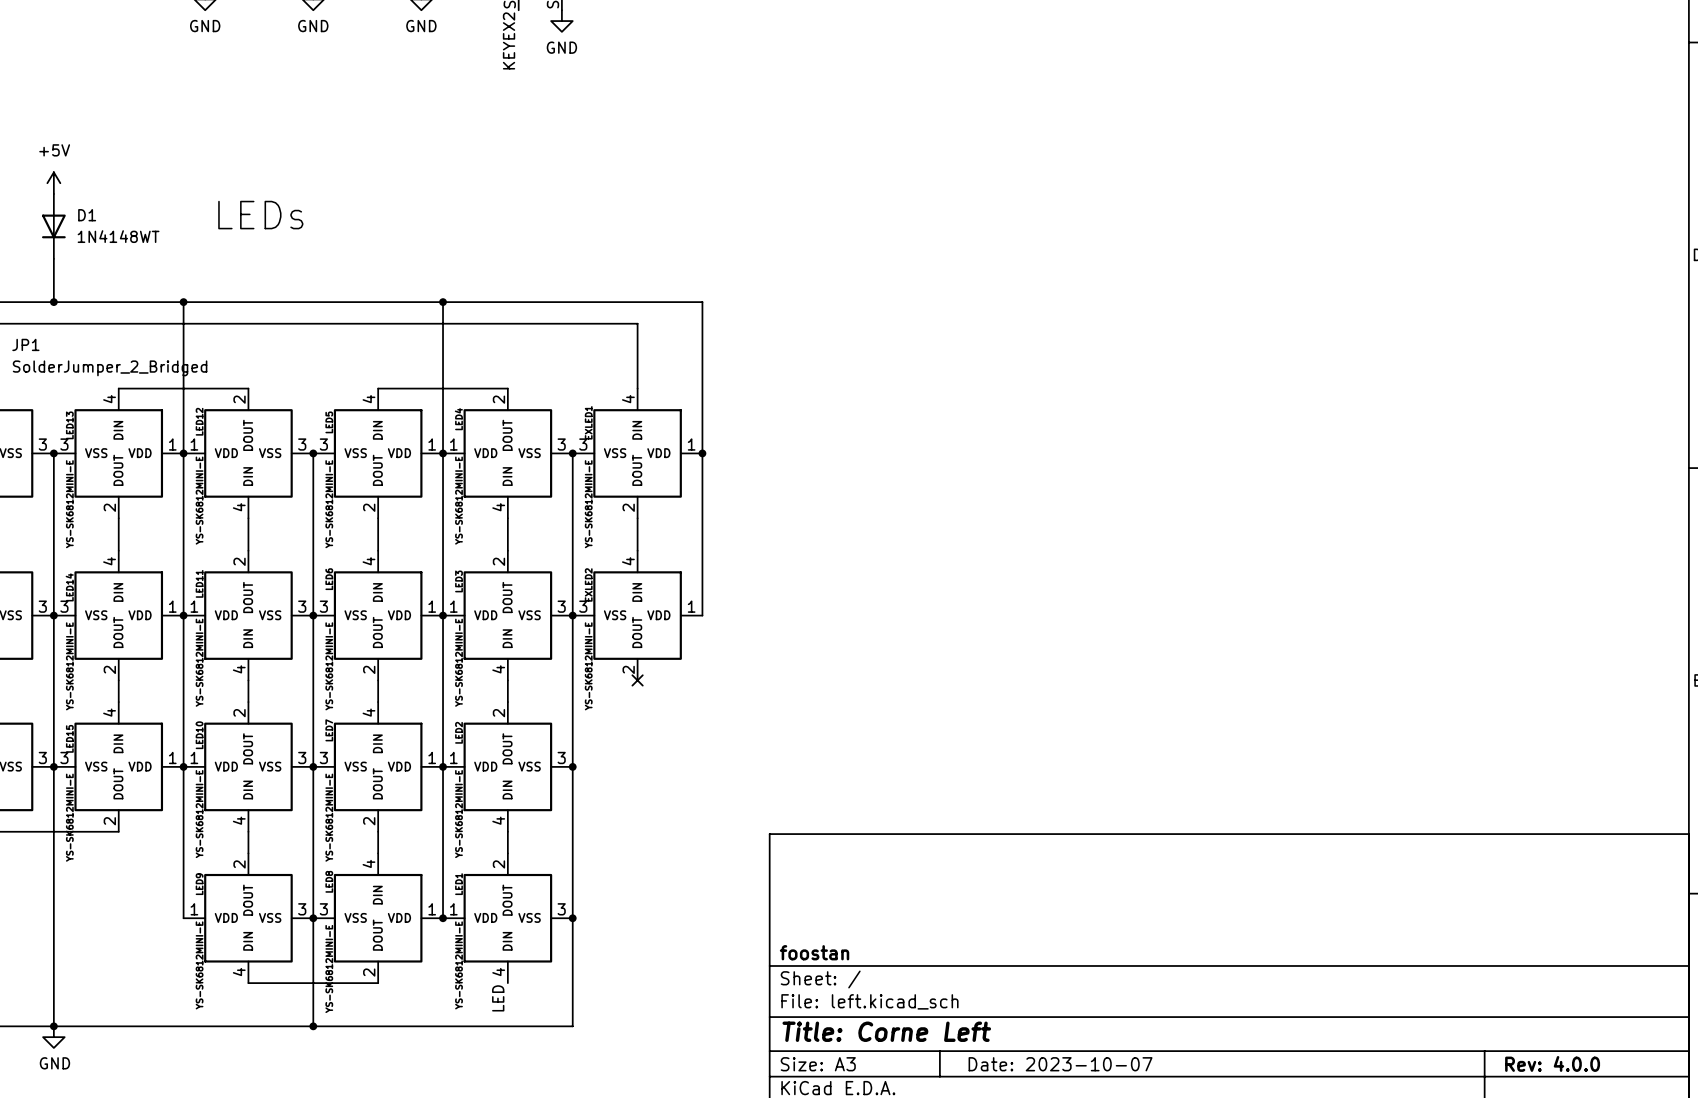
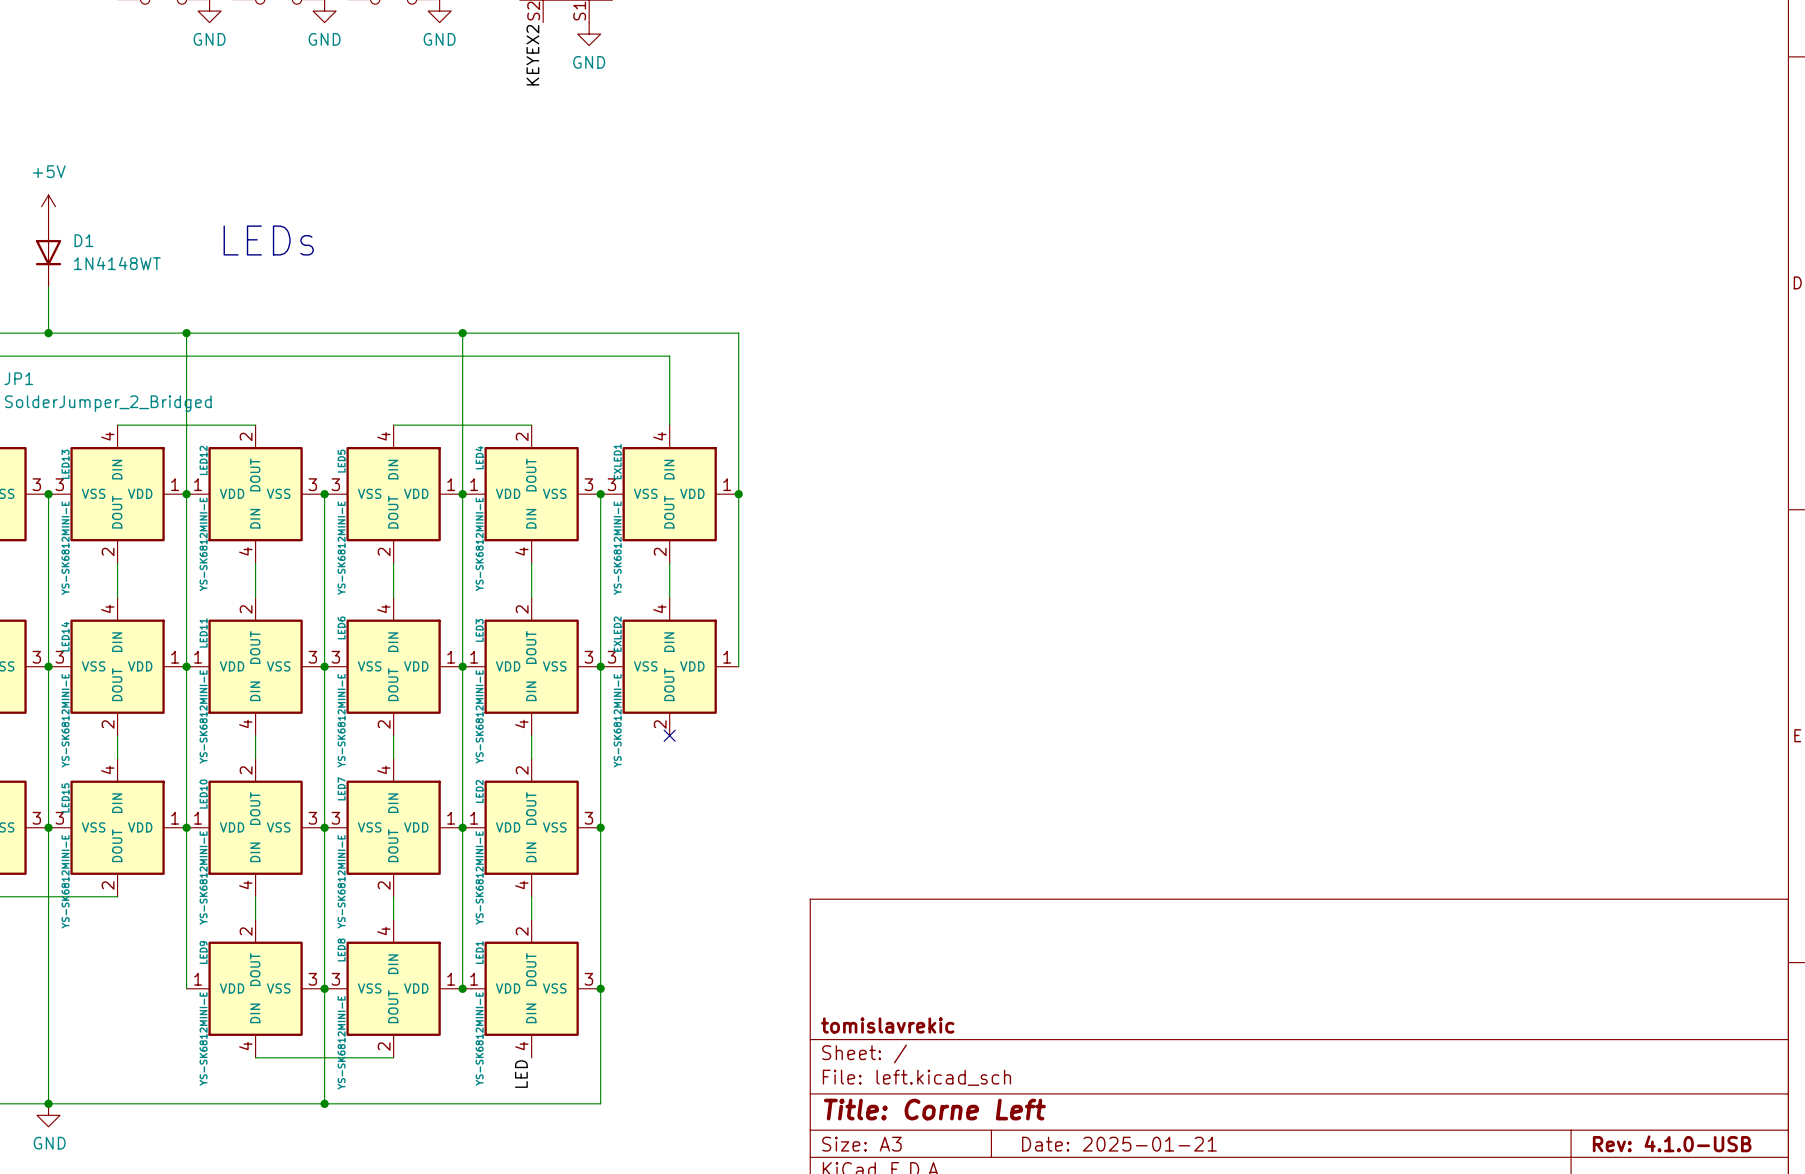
title block: foostan (814, 952) -> tomislavrekic (887, 1025)
title block: Rev: 4.0.0 (1552, 1063) -> Rev: 4.1.0-USB (1672, 1143)
title block: Date: 2023-10-07 (1060, 1064) -> Date: 2025-01-21 (1119, 1144)

